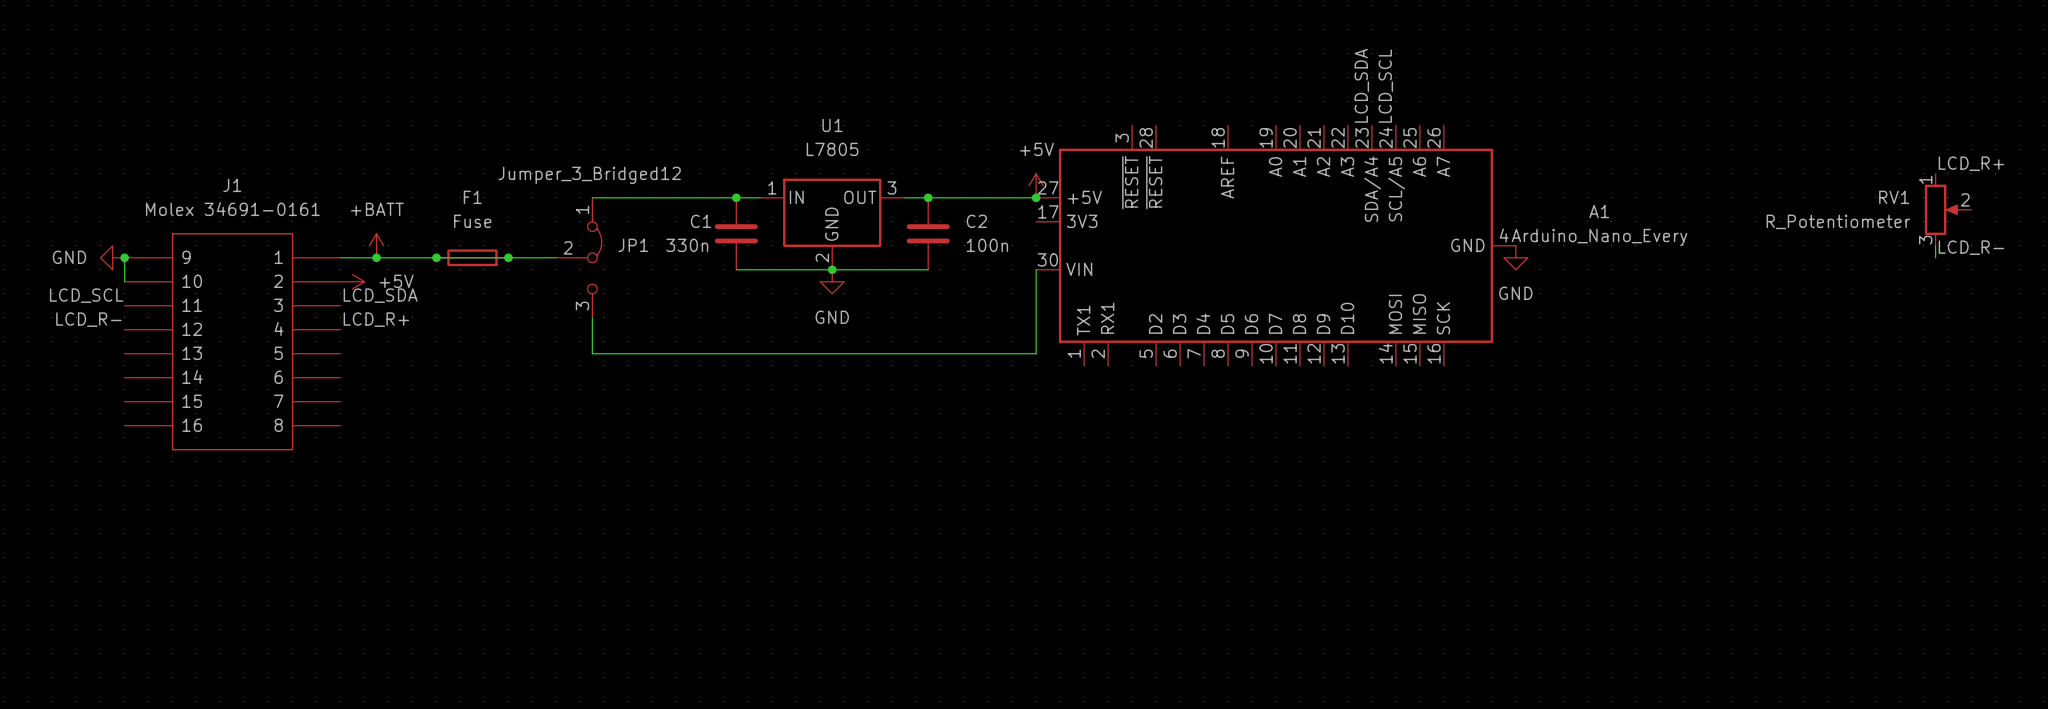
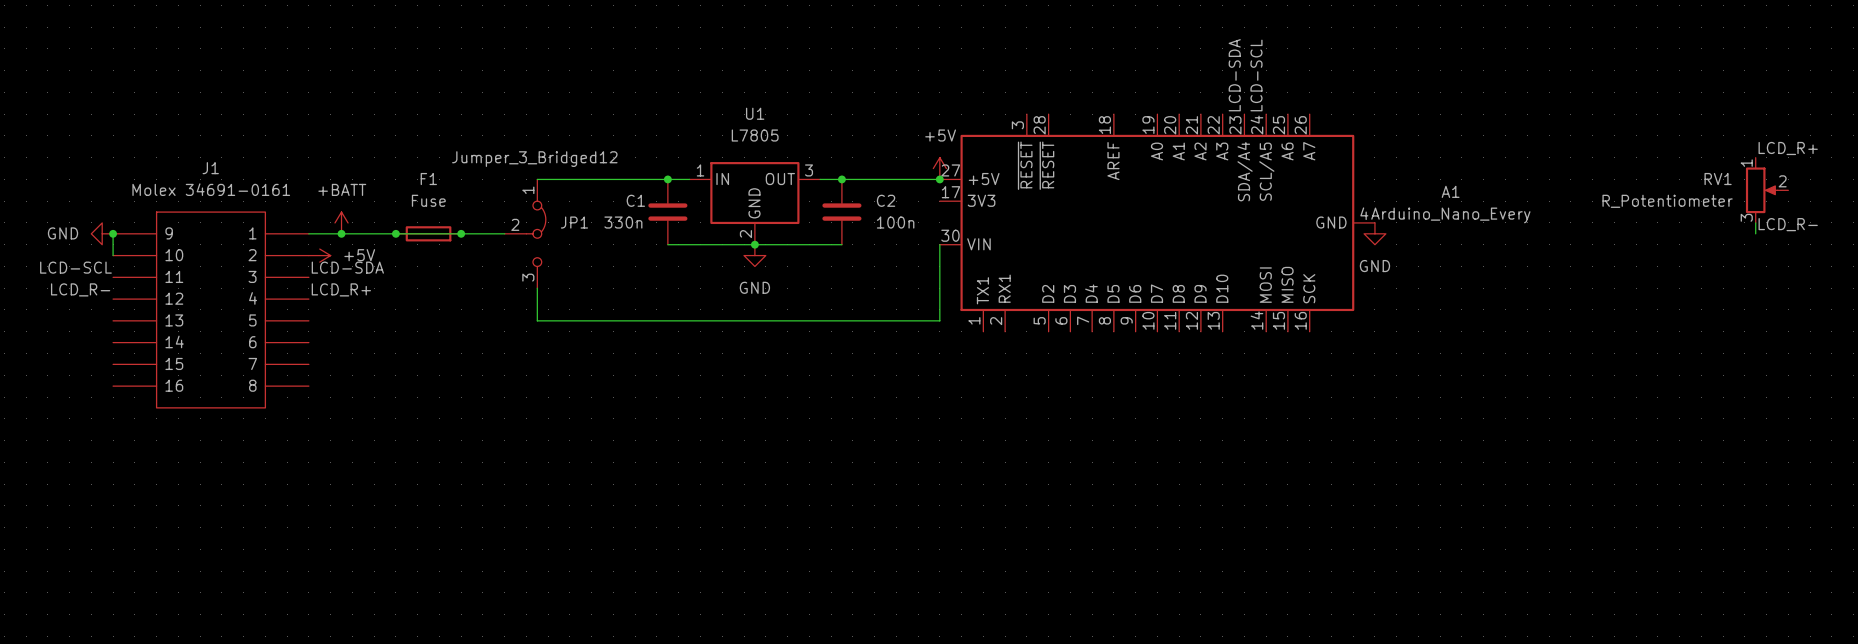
label: LCD_SDA (1361, 85) -> LCD-SDA (1234, 75)
label: LCD_SCL (1385, 86) -> LCD-SCL (1256, 75)
label: LCD_SCL (86, 295) -> LCD-SCL (75, 267)
label: LCD_SDA (380, 295) -> LCD-SDA (347, 267)

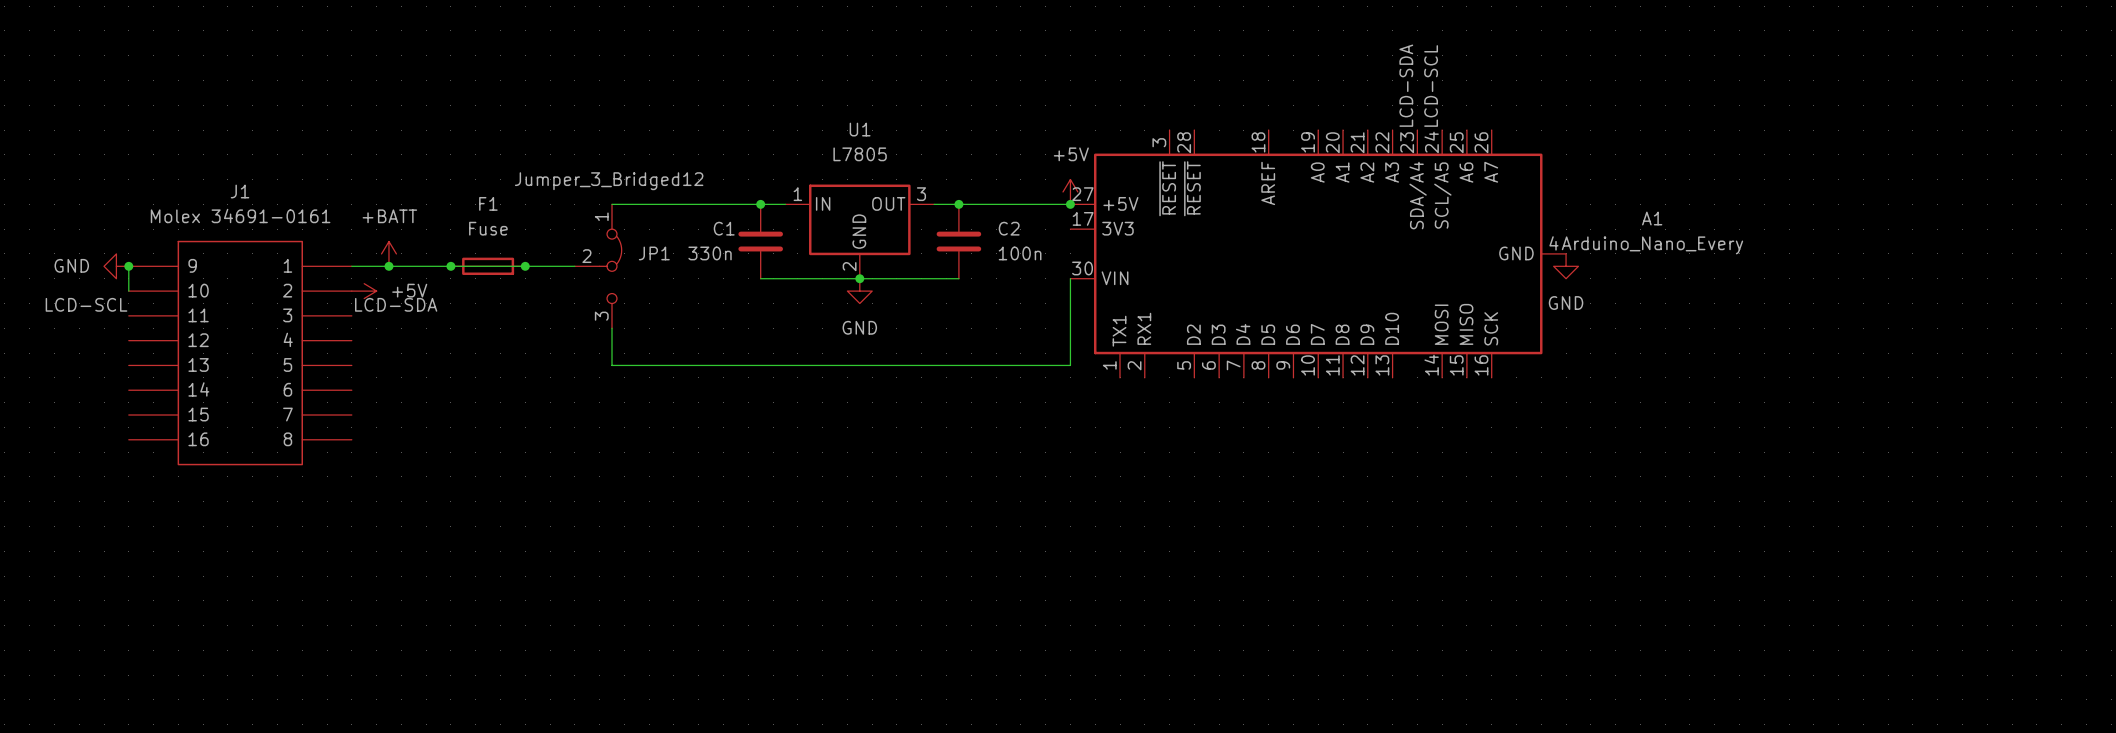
label: LCD_R+ (1788, 148) -> none
RV1: R_Potentiometer (1767, 190) -> none
wire: (1755, 222) (1755, 233) -> none
label: LCD_R- (1788, 224) -> none
label: LCD_R- (80, 289) -> none
label: LCD_R+ (341, 289) -> none

